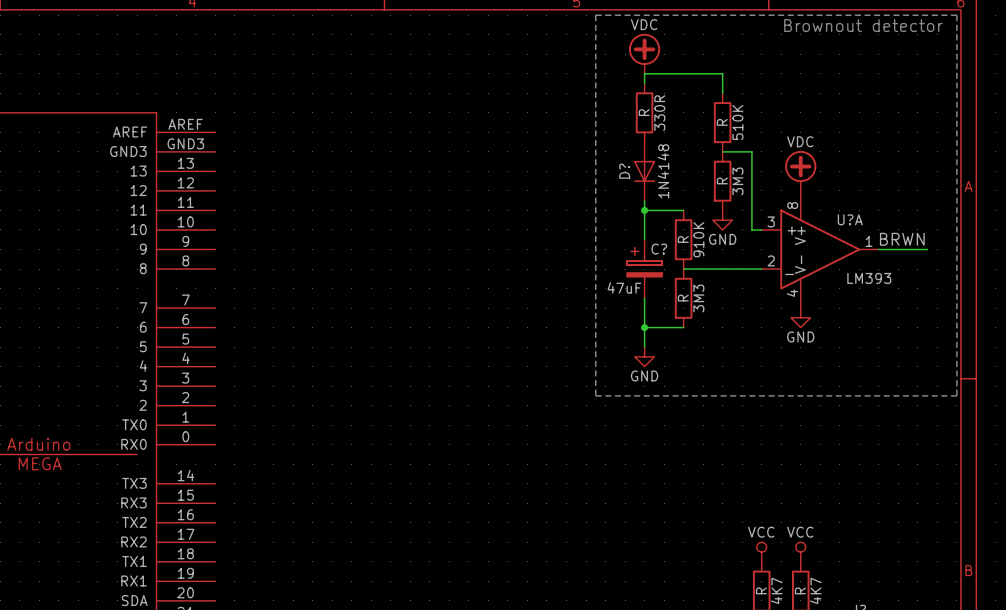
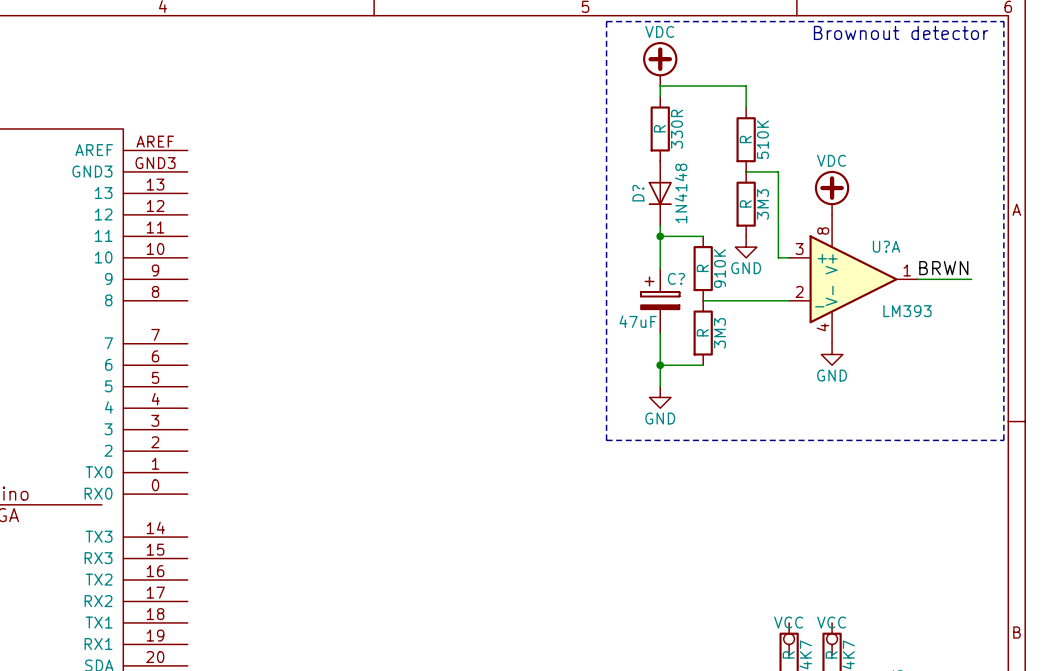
power symbol: VCC (761, 552) -> none
power symbol: VCC (800, 552) -> none
power symbol: none -> VCC (789, 644)
power symbol: none -> VCC (832, 644)

